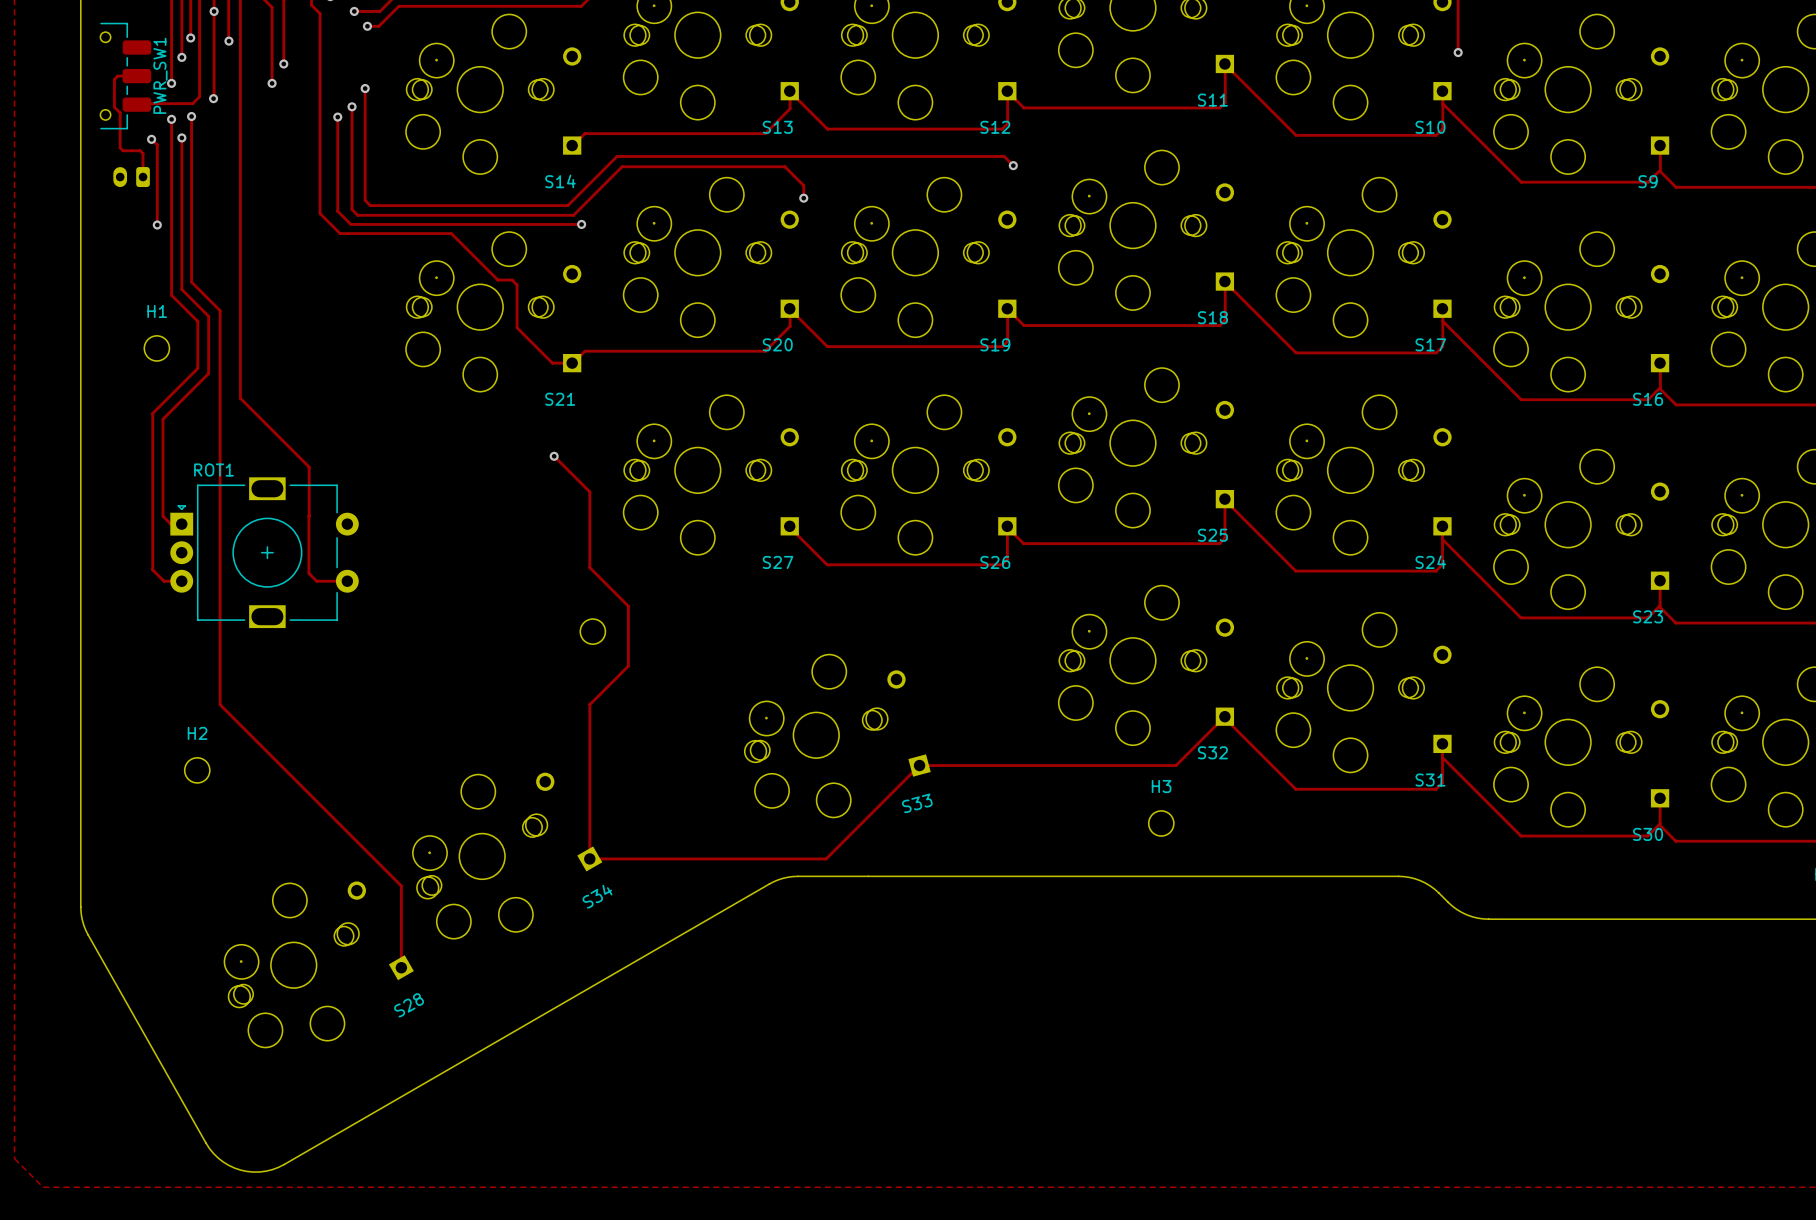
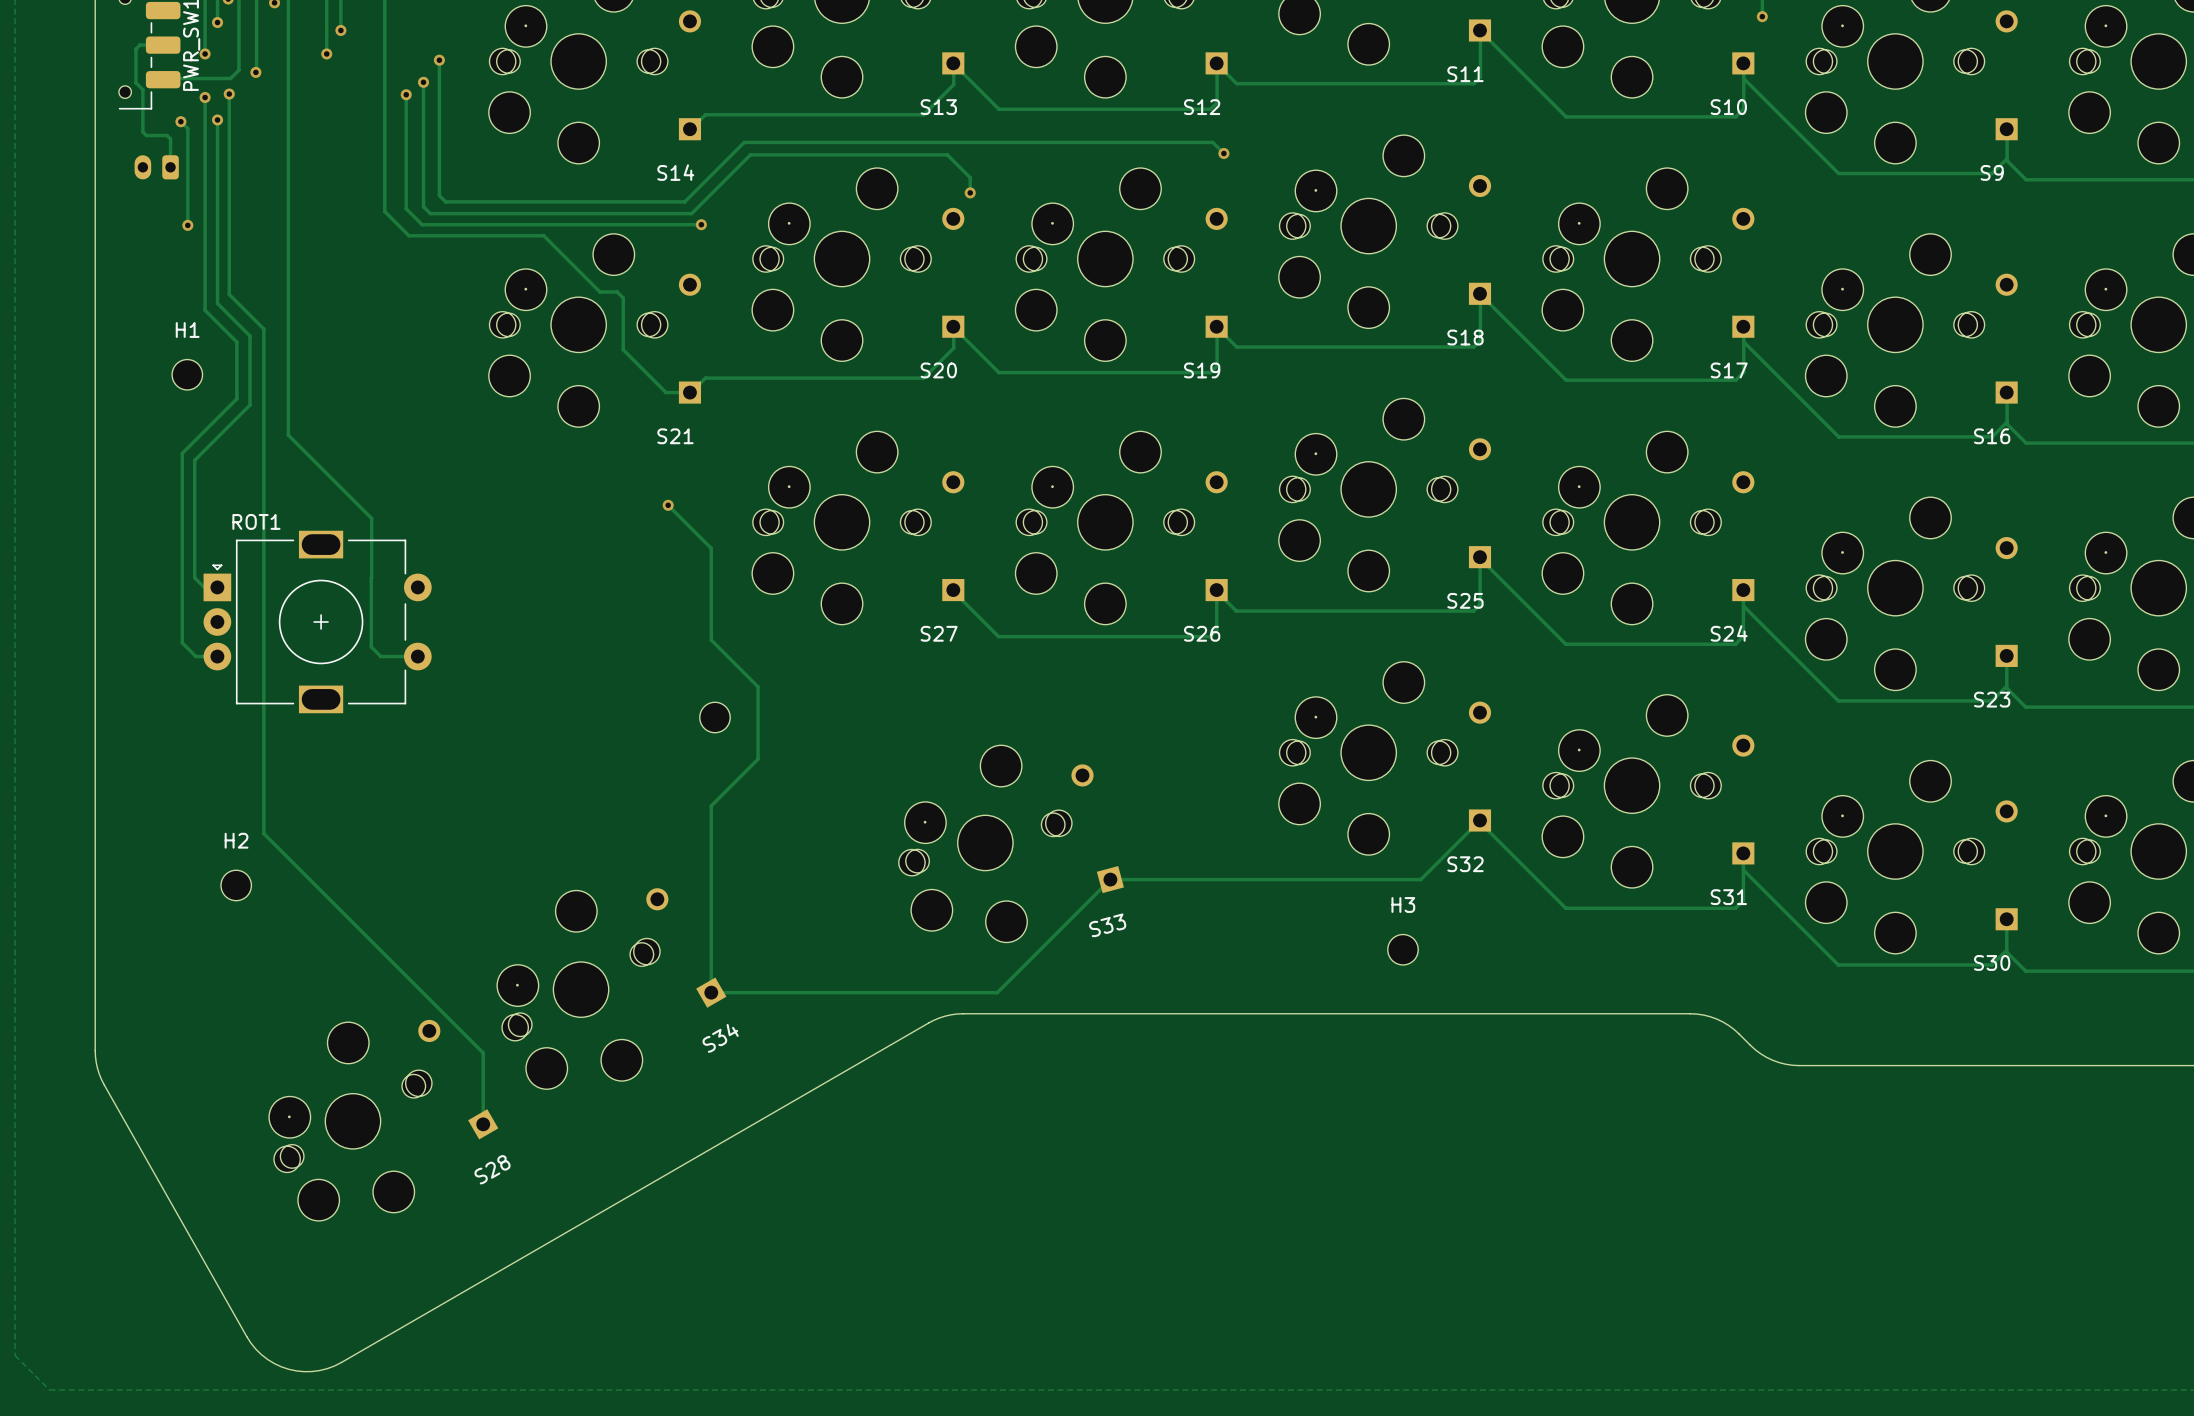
track: (220, 704) (401, 885) (401, 908) -> (263, 805) (263, 833) (483, 1053)

